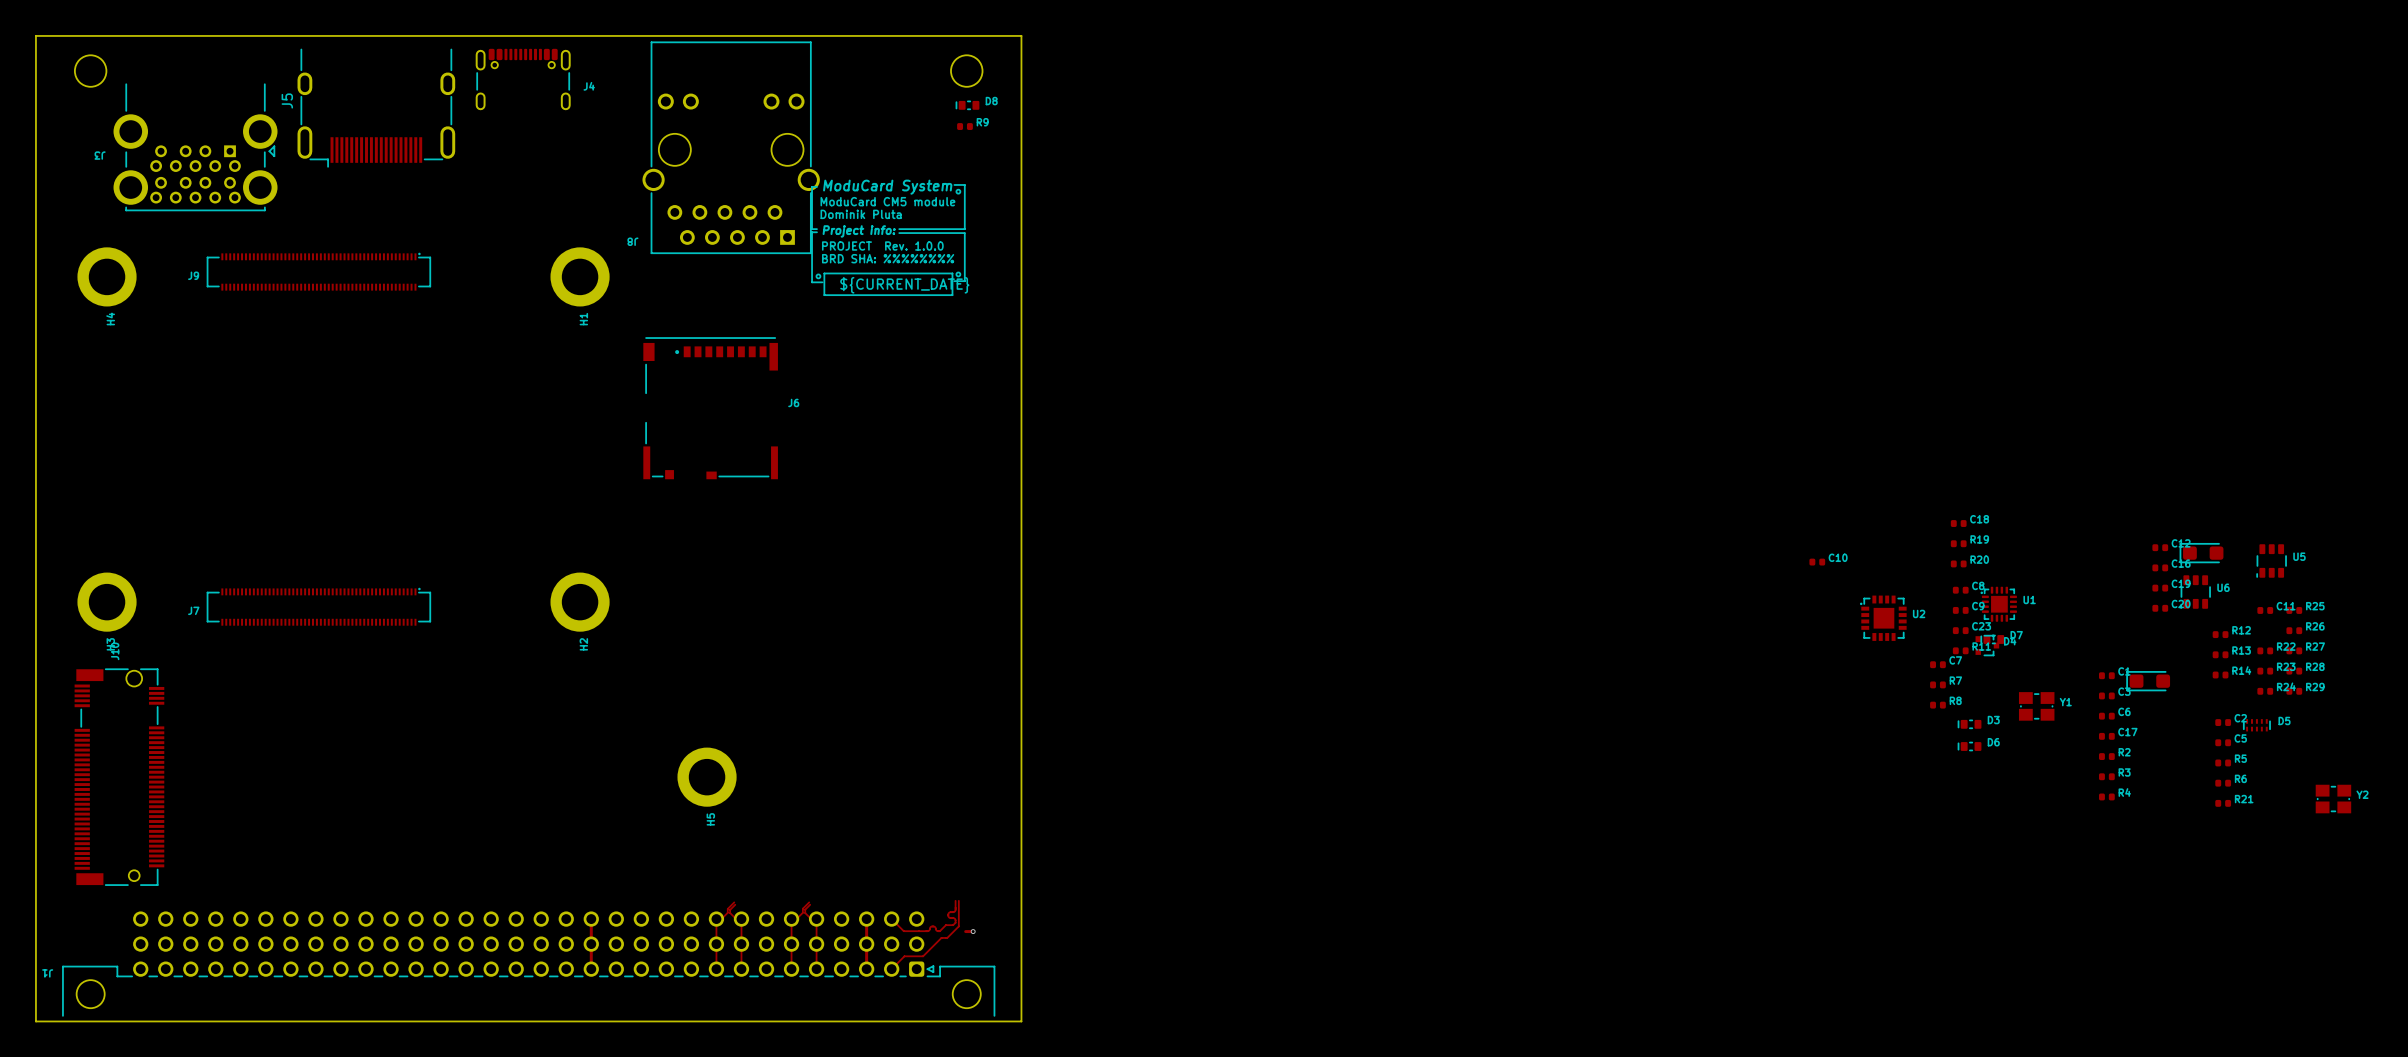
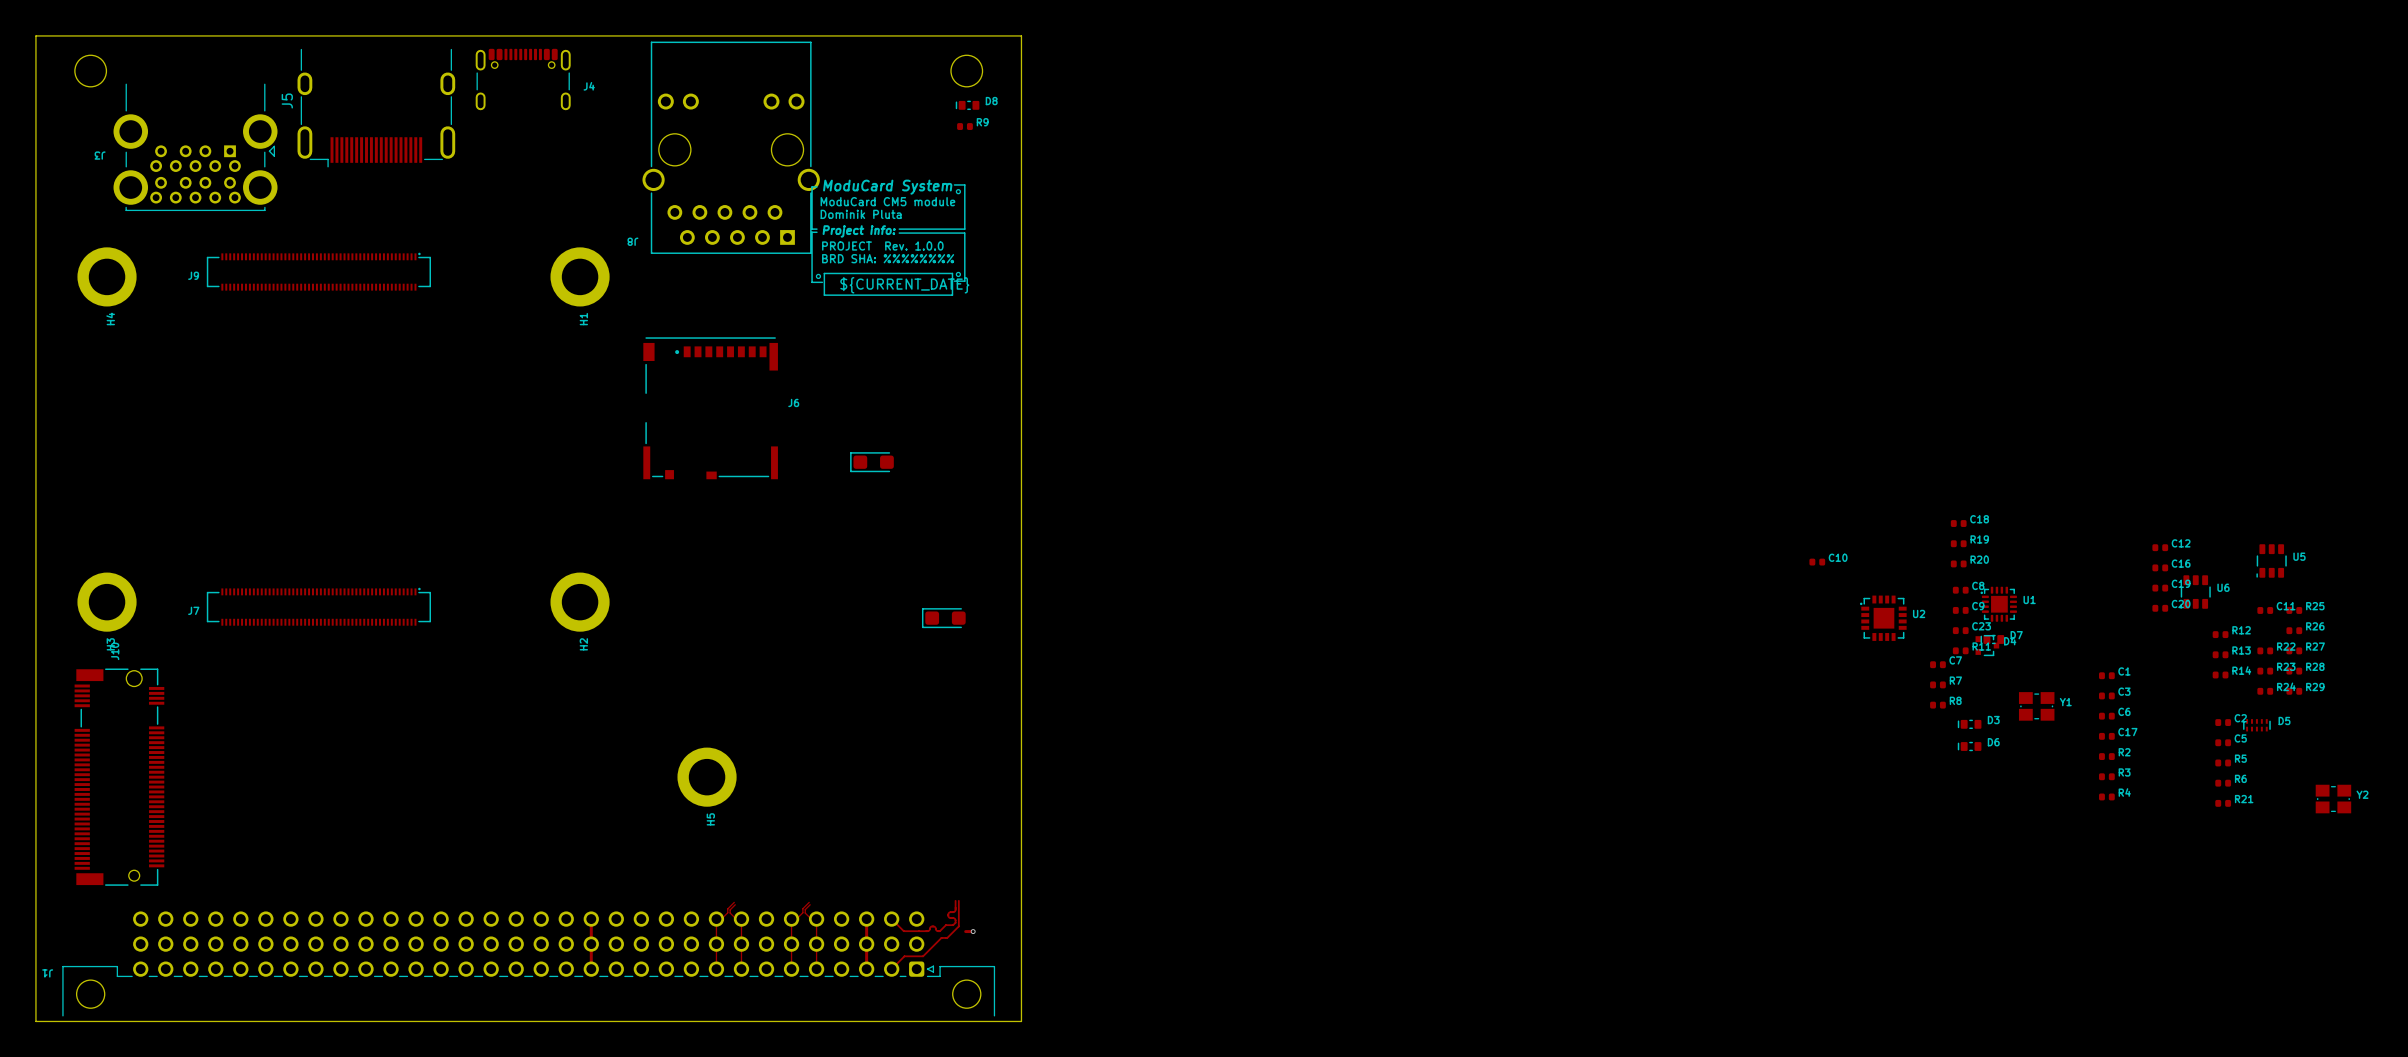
part: none -> (871, 462)
part: (2201, 553) -> none
part: none -> (943, 618)
part: (2148, 681) -> none

